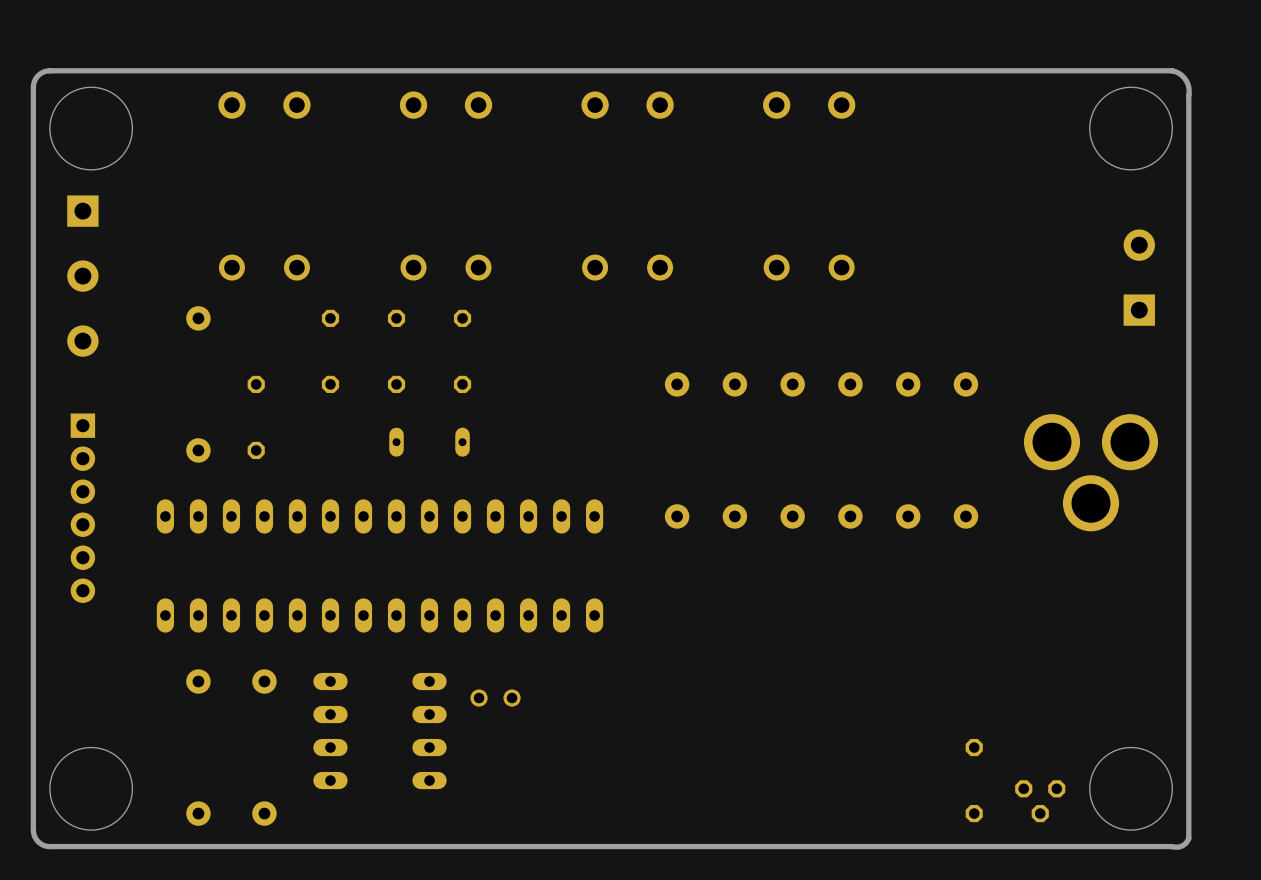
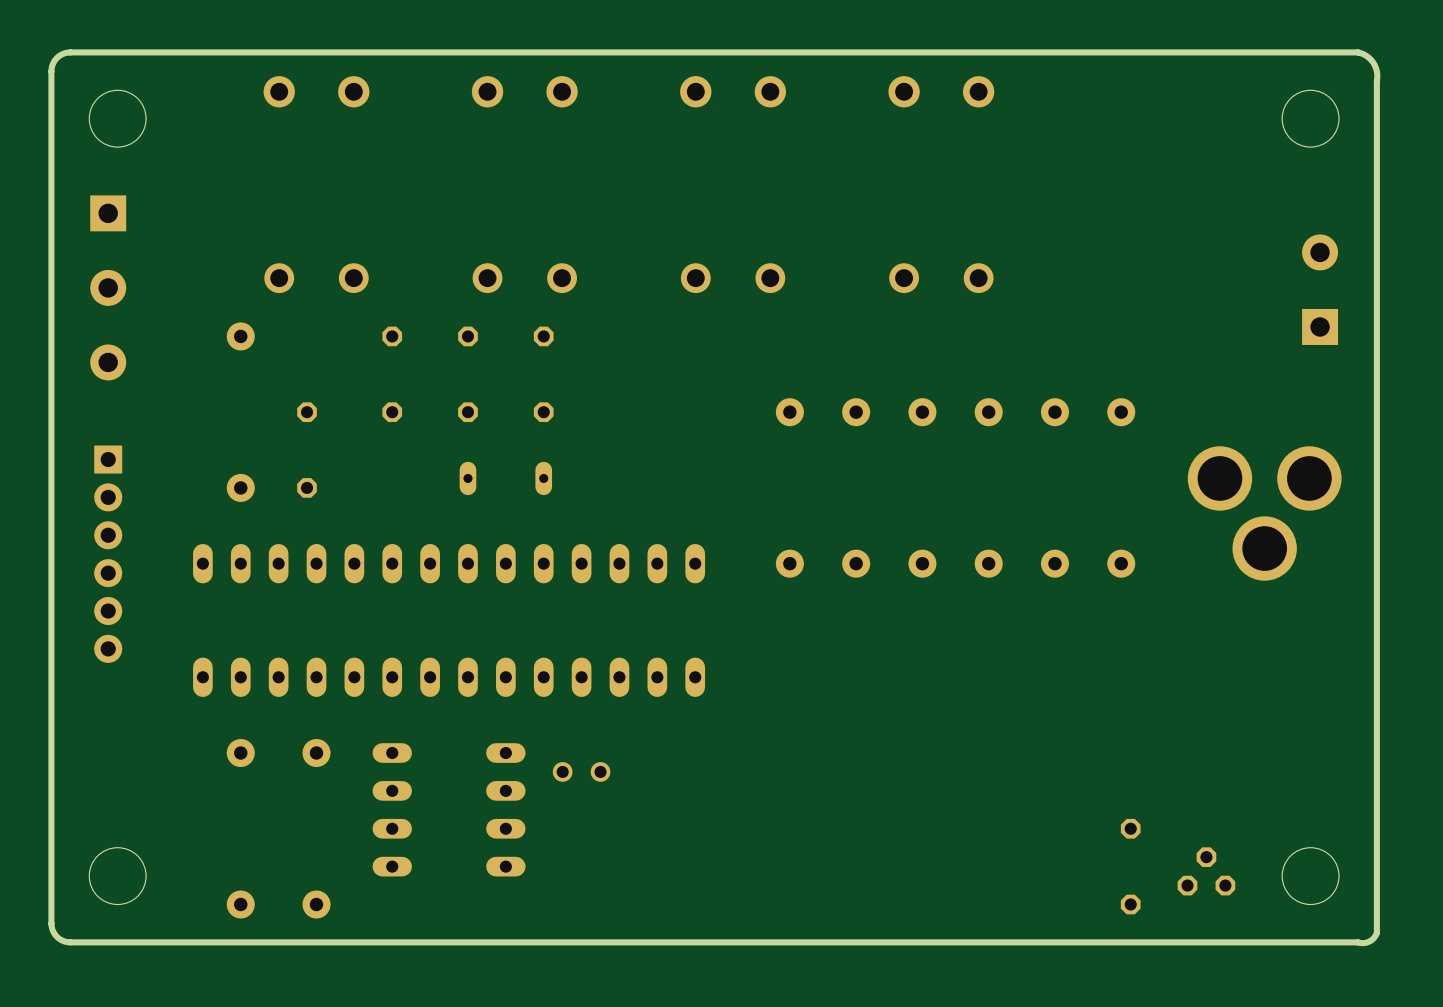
round board edge size: [49, 87, 133, 171] -> [89, 90, 147, 148]
round board edge size: [1089, 87, 1173, 171] -> [1282, 90, 1340, 148]
round board edge size: [49, 747, 133, 831] -> [89, 847, 147, 905]
round board edge size: [1089, 747, 1173, 831] -> [1282, 847, 1340, 905]
part rotation: 0° (1040, 801) -> 180° (1206, 871)

